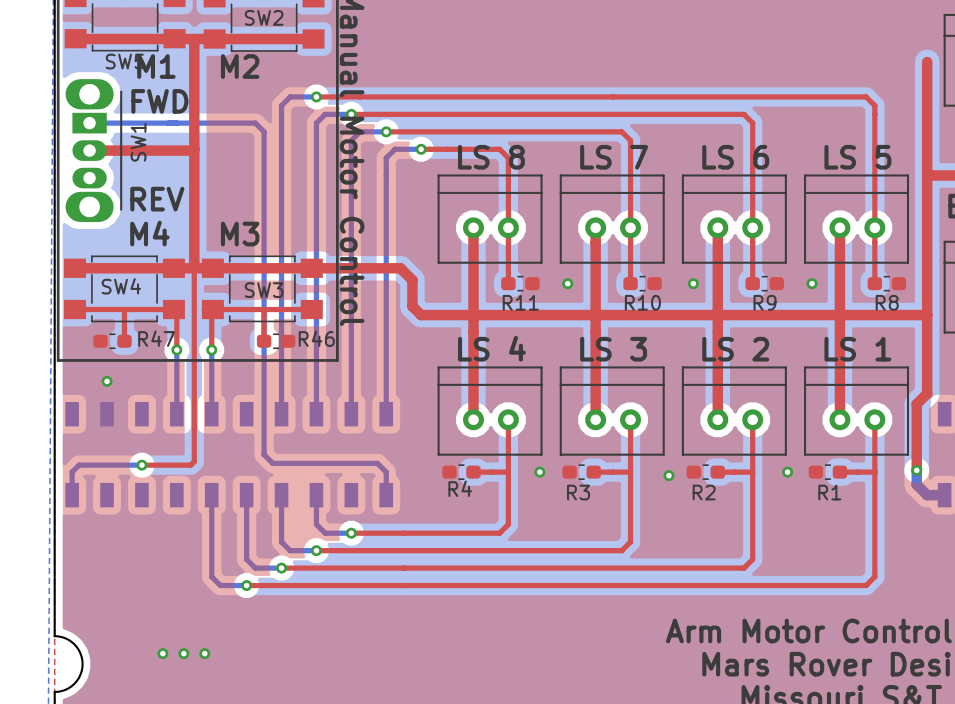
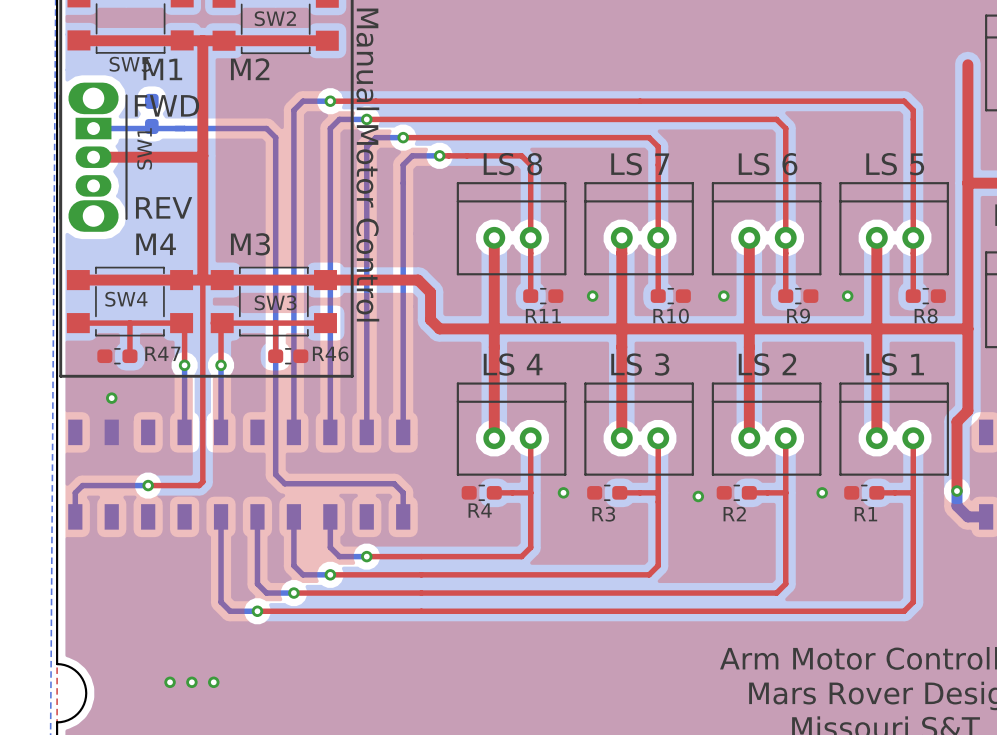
part: none -> (151, 113)

